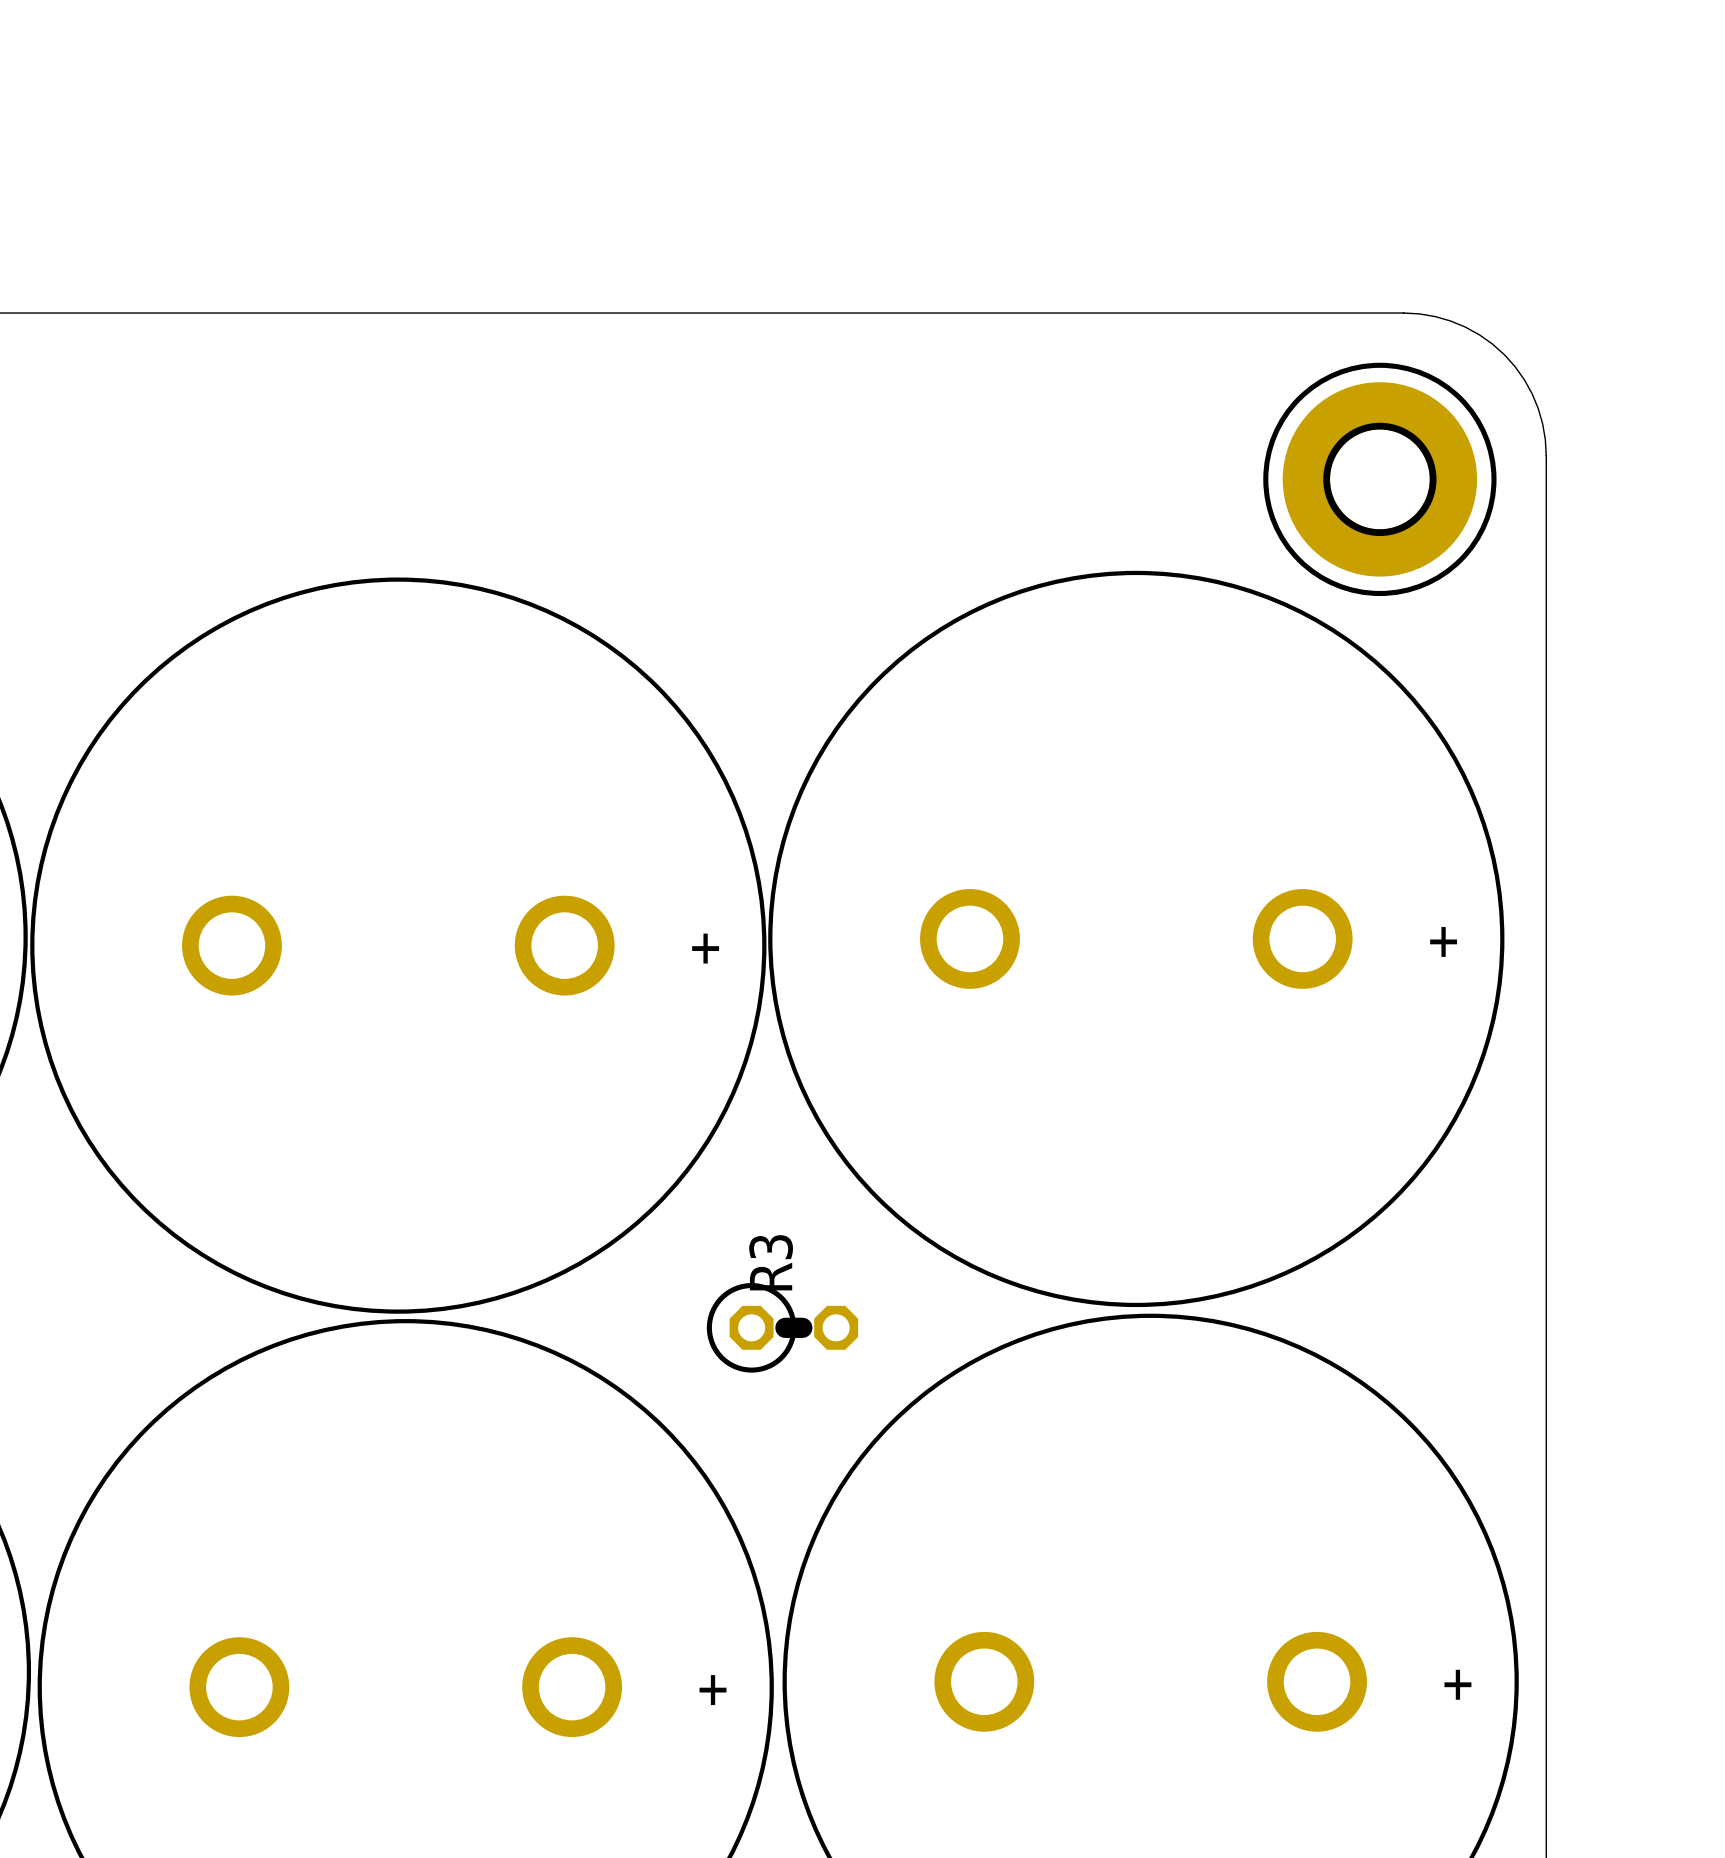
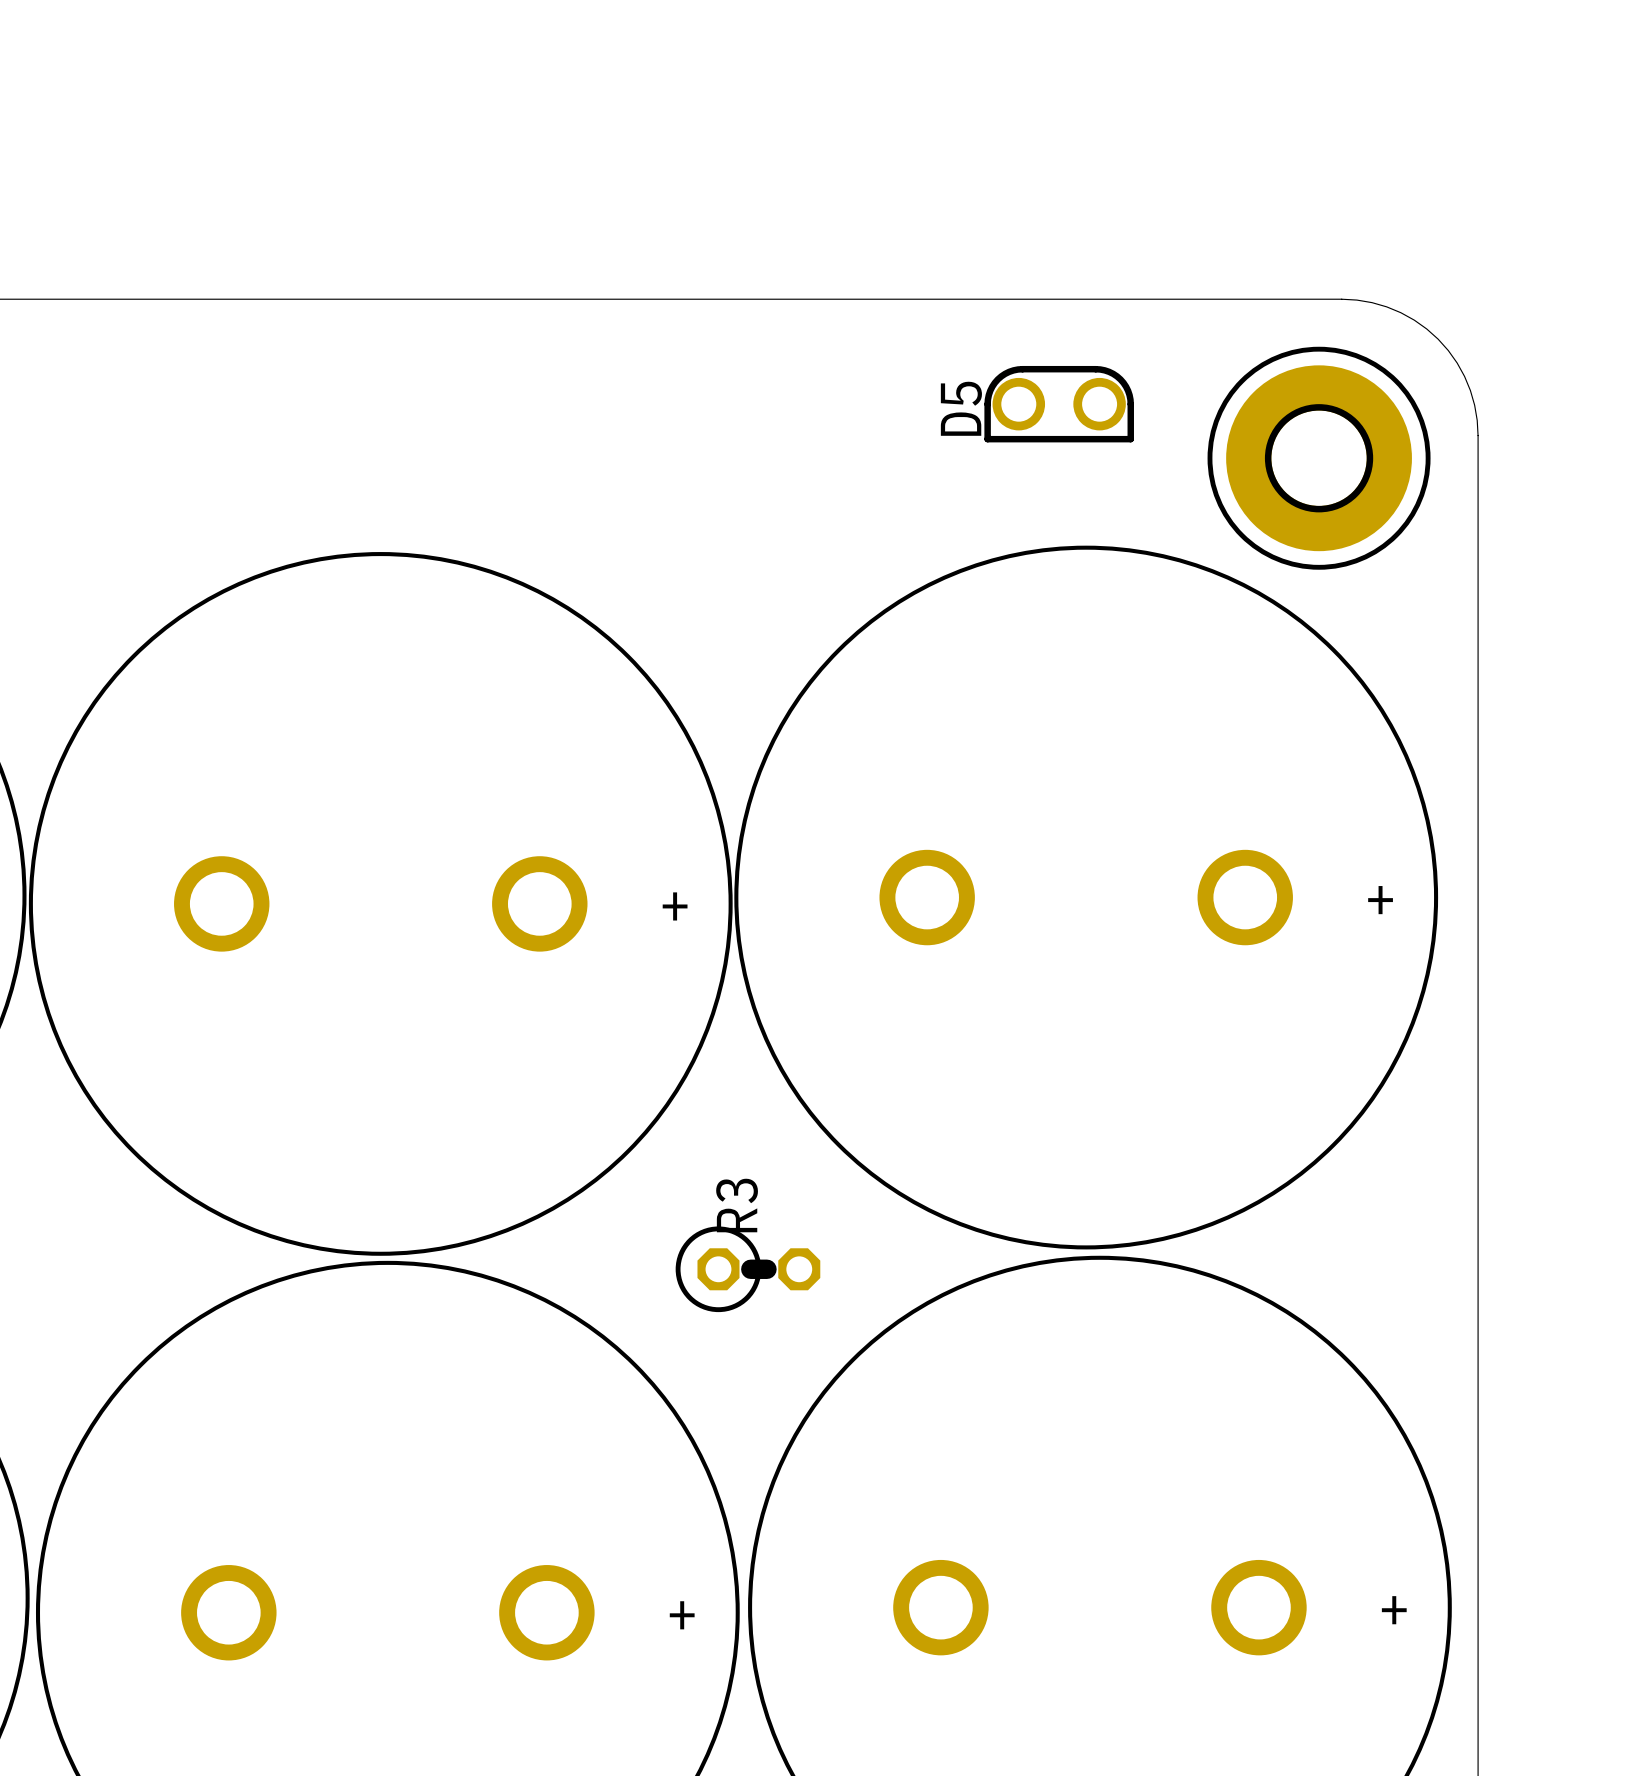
D5: none -> (1059, 404)

